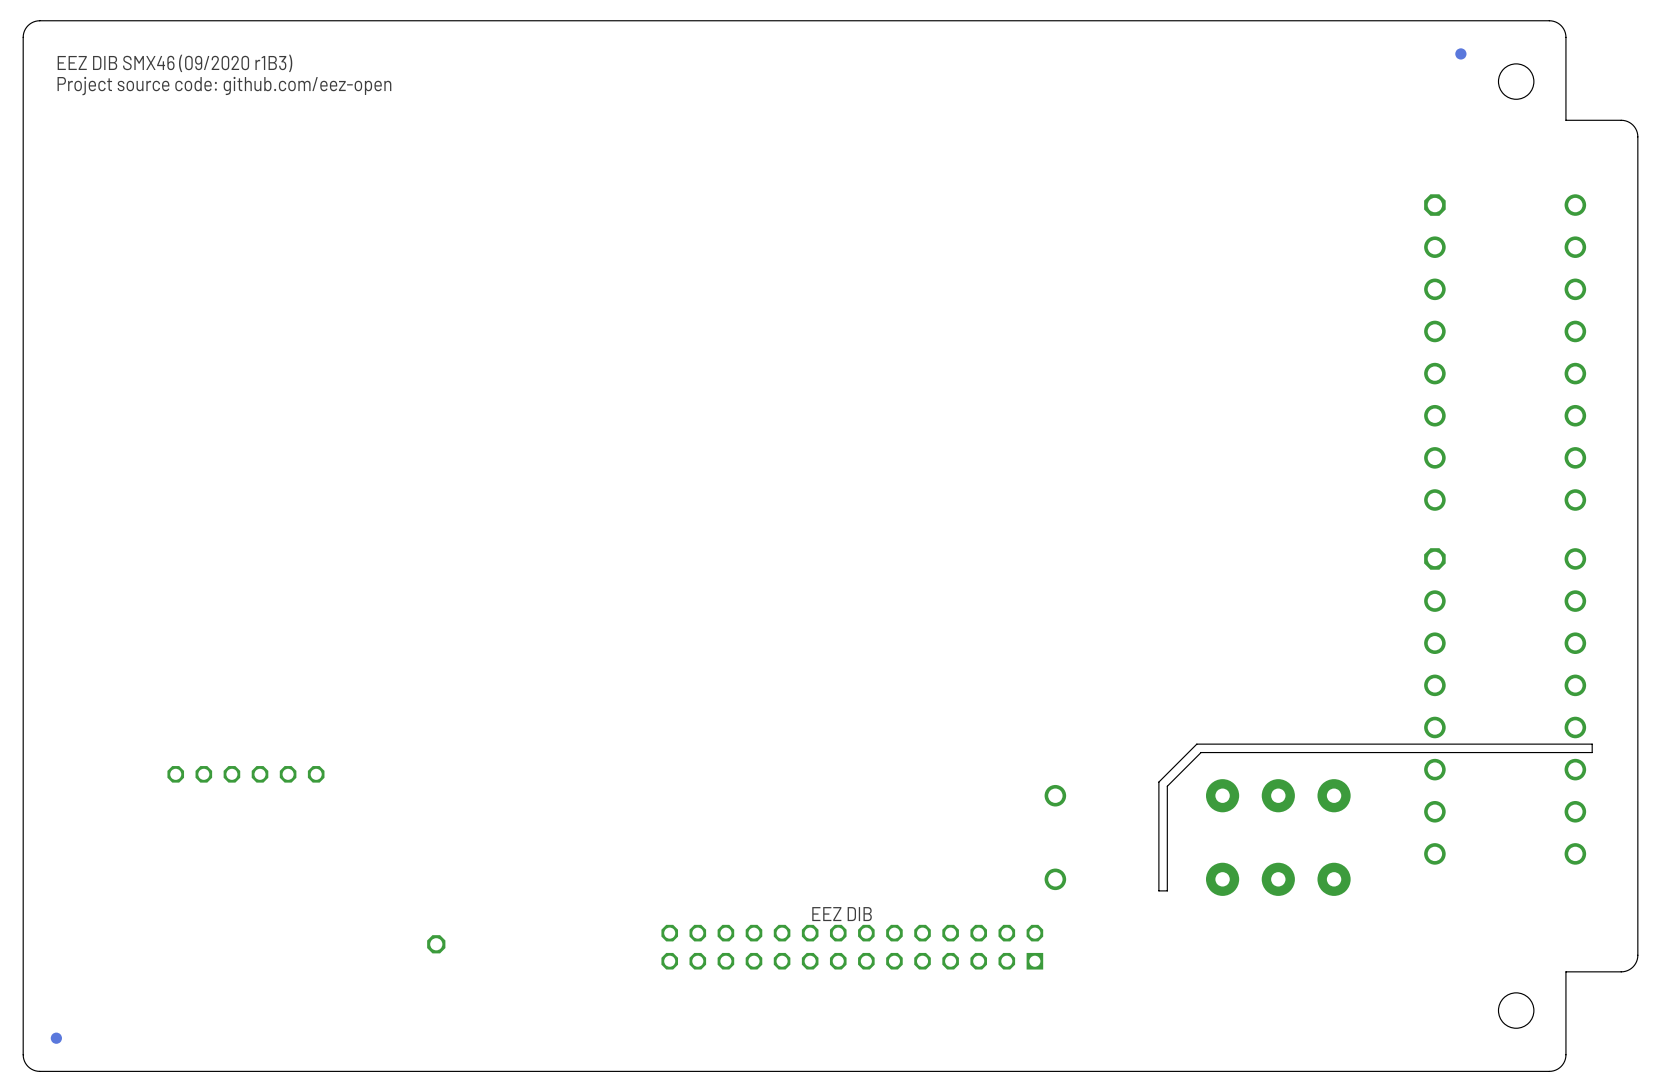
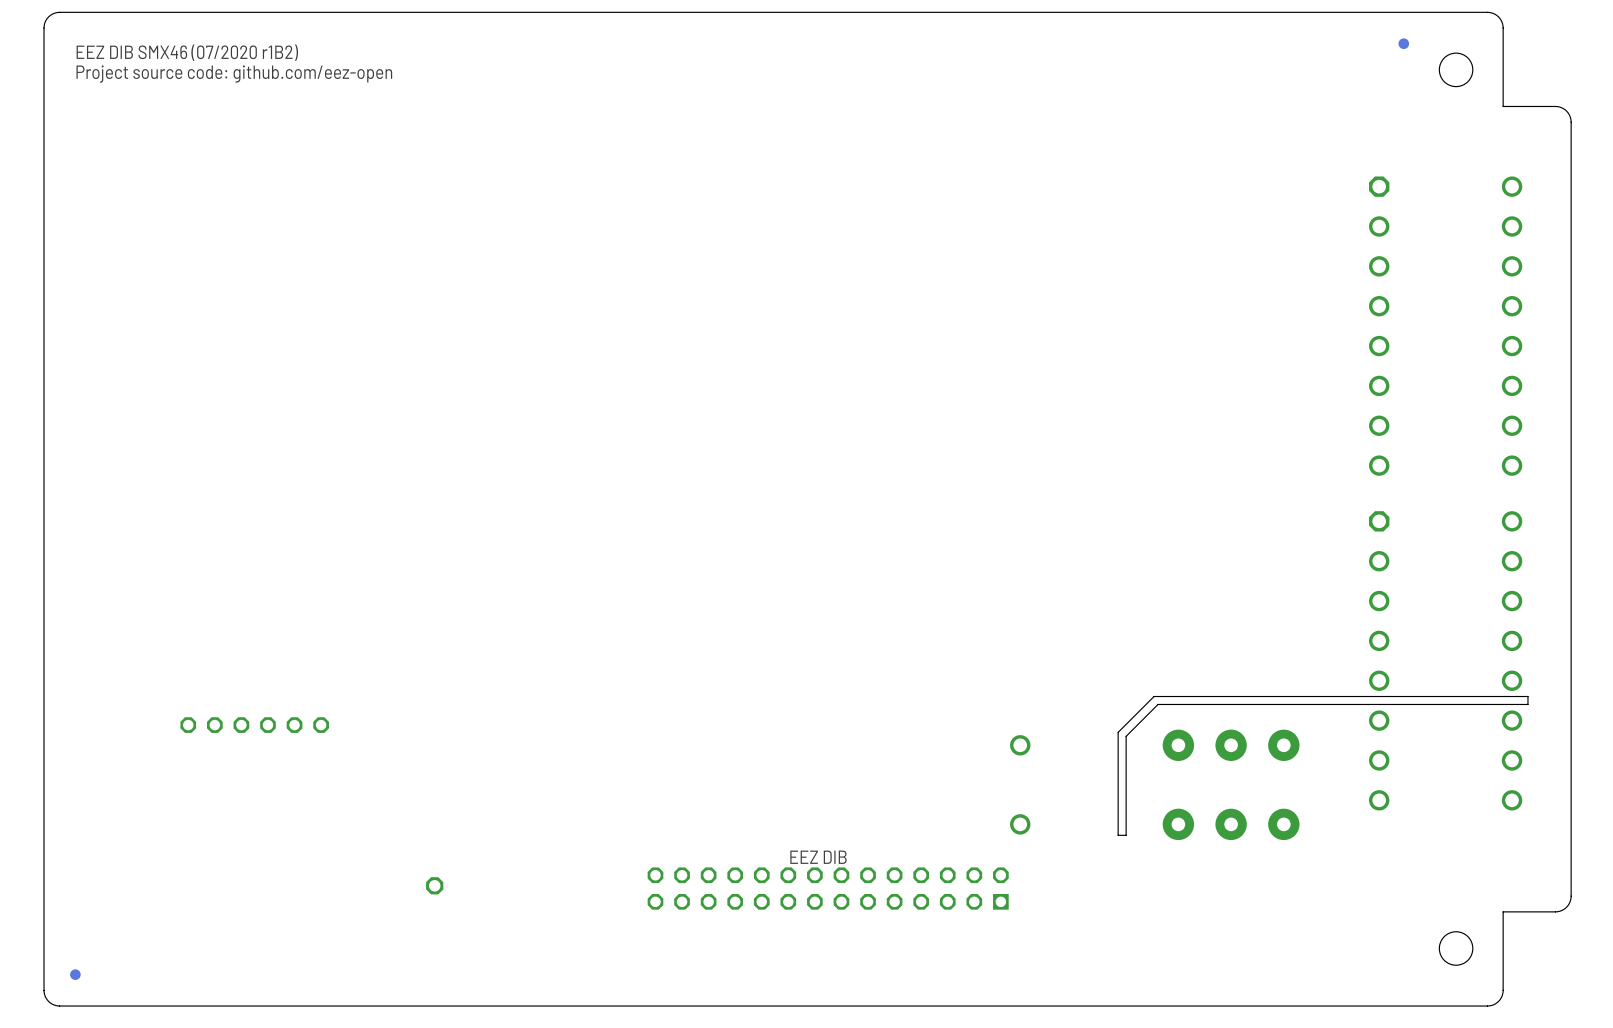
text: EEZ DIB SMX46 (09/2020 r1B3) (174, 63) -> EEZ DIB SMX46 (07/2020 r1B2) (187, 52)

